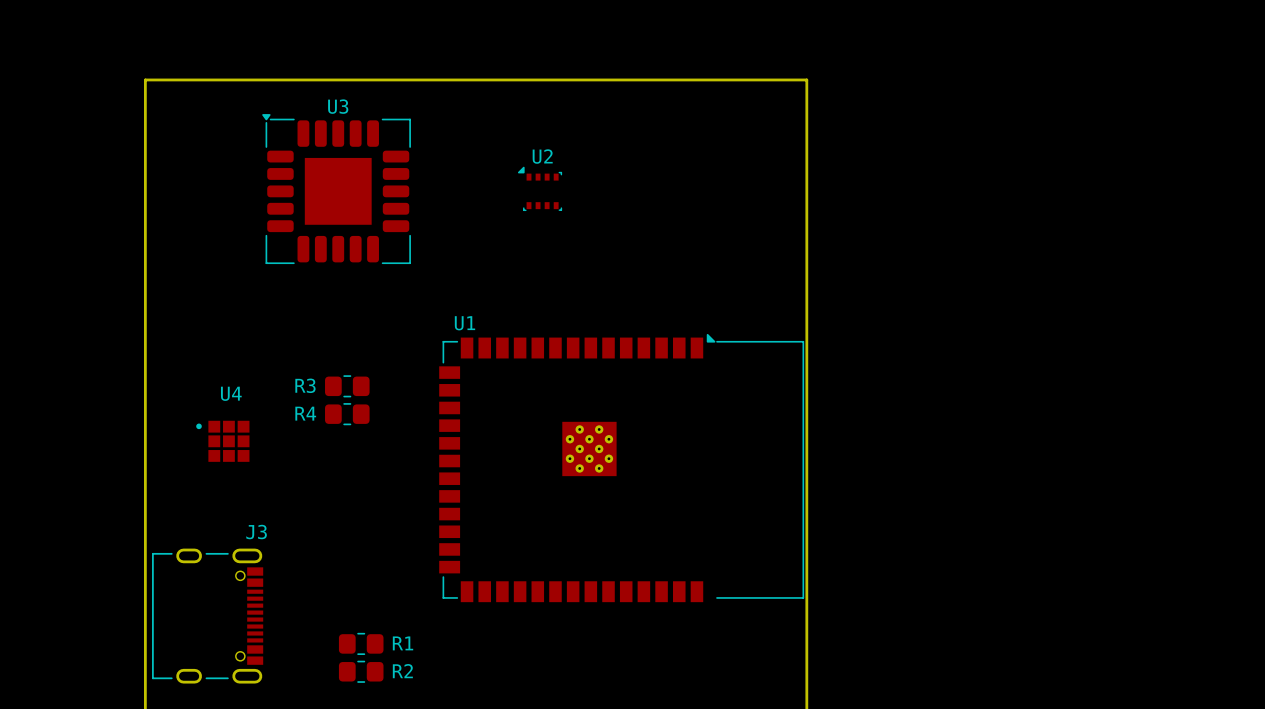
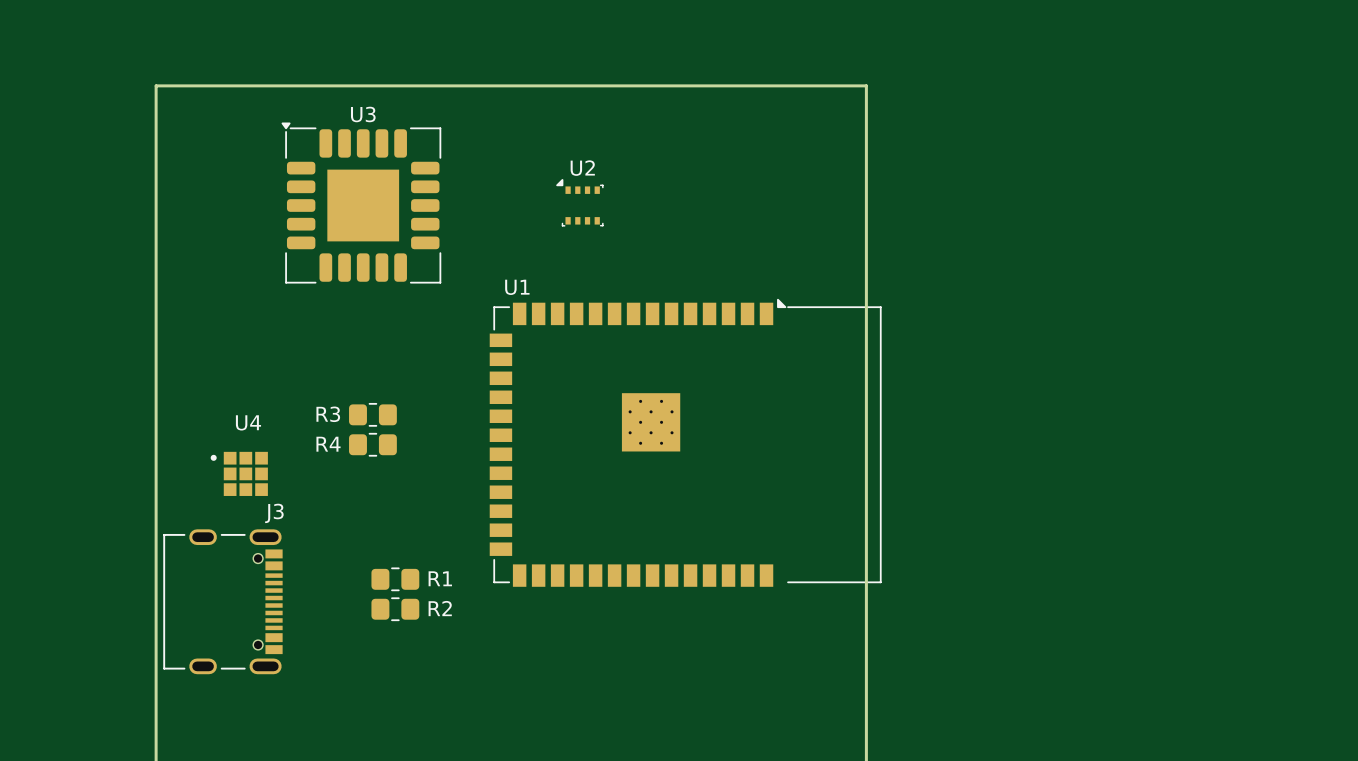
U1 position: (621, 468) -> (685, 442)
J3 position: (207, 616) -> (222, 601)
R1 position: (361, 643) -> (395, 579)
R2 position: (361, 671) -> (395, 609)

